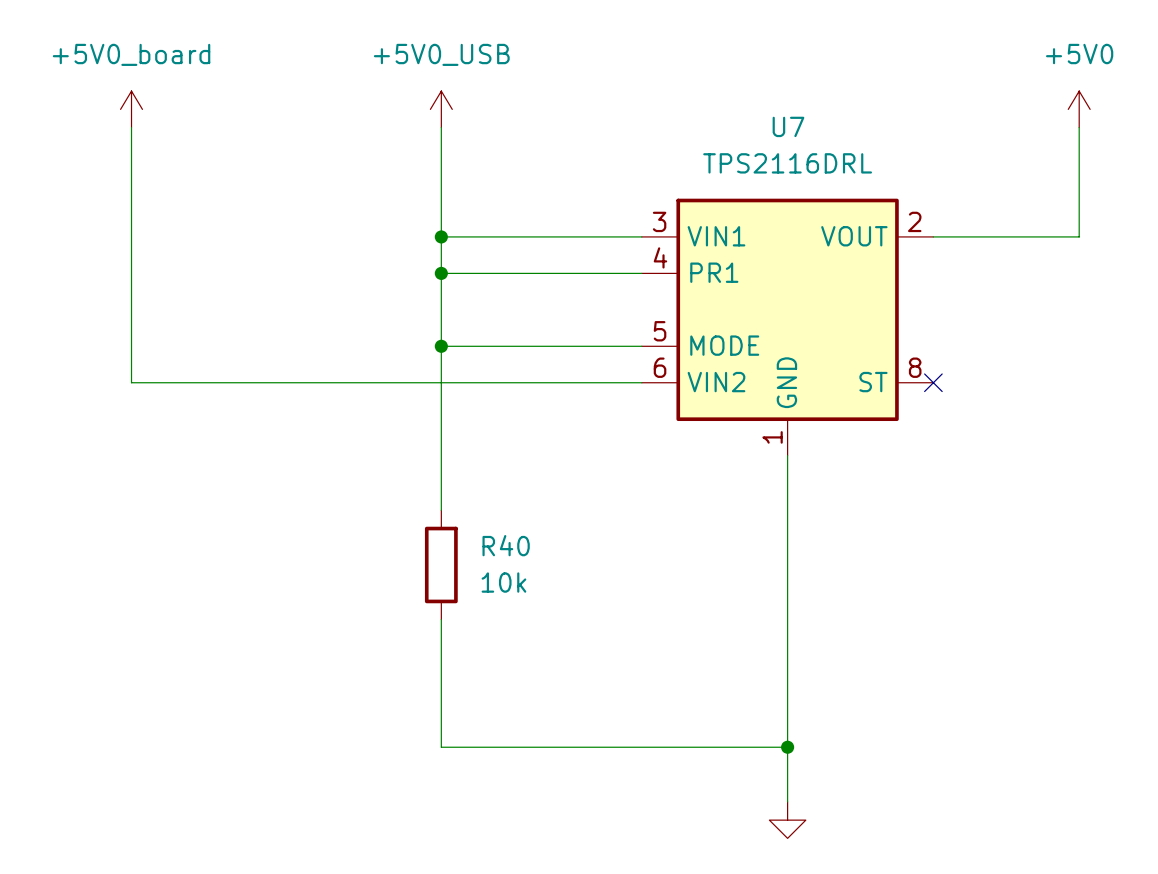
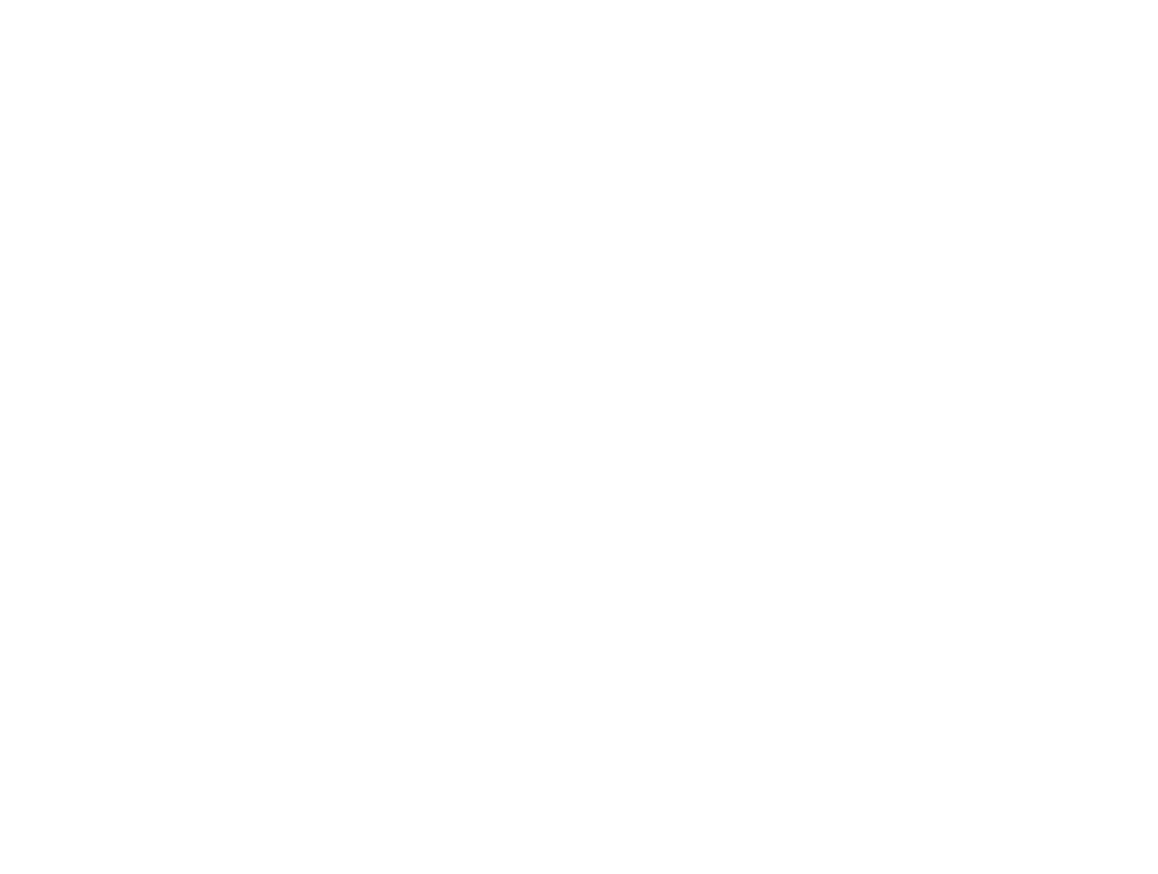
power symbol: +5V0_board (131, 109) -> none
power symbol: +5V0_USB (441, 109) -> none
power symbol: +5V0 (1079, 109) -> none
wire: (131, 127) (131, 382) (641, 382) -> none
wire: (441, 127) (441, 510) -> none
wire: (1079, 127) (1079, 236) (933, 236) -> none
wire: (441, 236) (641, 236) -> none
junction: (441, 236) -> none
wire: (441, 273) (641, 273) -> none
junction: (441, 273) -> none
U7: TPS2116DRL (787, 327) -> none
wire: (441, 346) (641, 346) -> none
junction: (441, 346) -> none
no-connect mark: (933, 382) -> none
wire: (787, 455) (787, 801) -> none
R40: 10k (441, 564) -> none
wire: (441, 619) (441, 747) (787, 747) -> none
junction: (787, 747) -> none
power symbol: (787, 820) -> none

